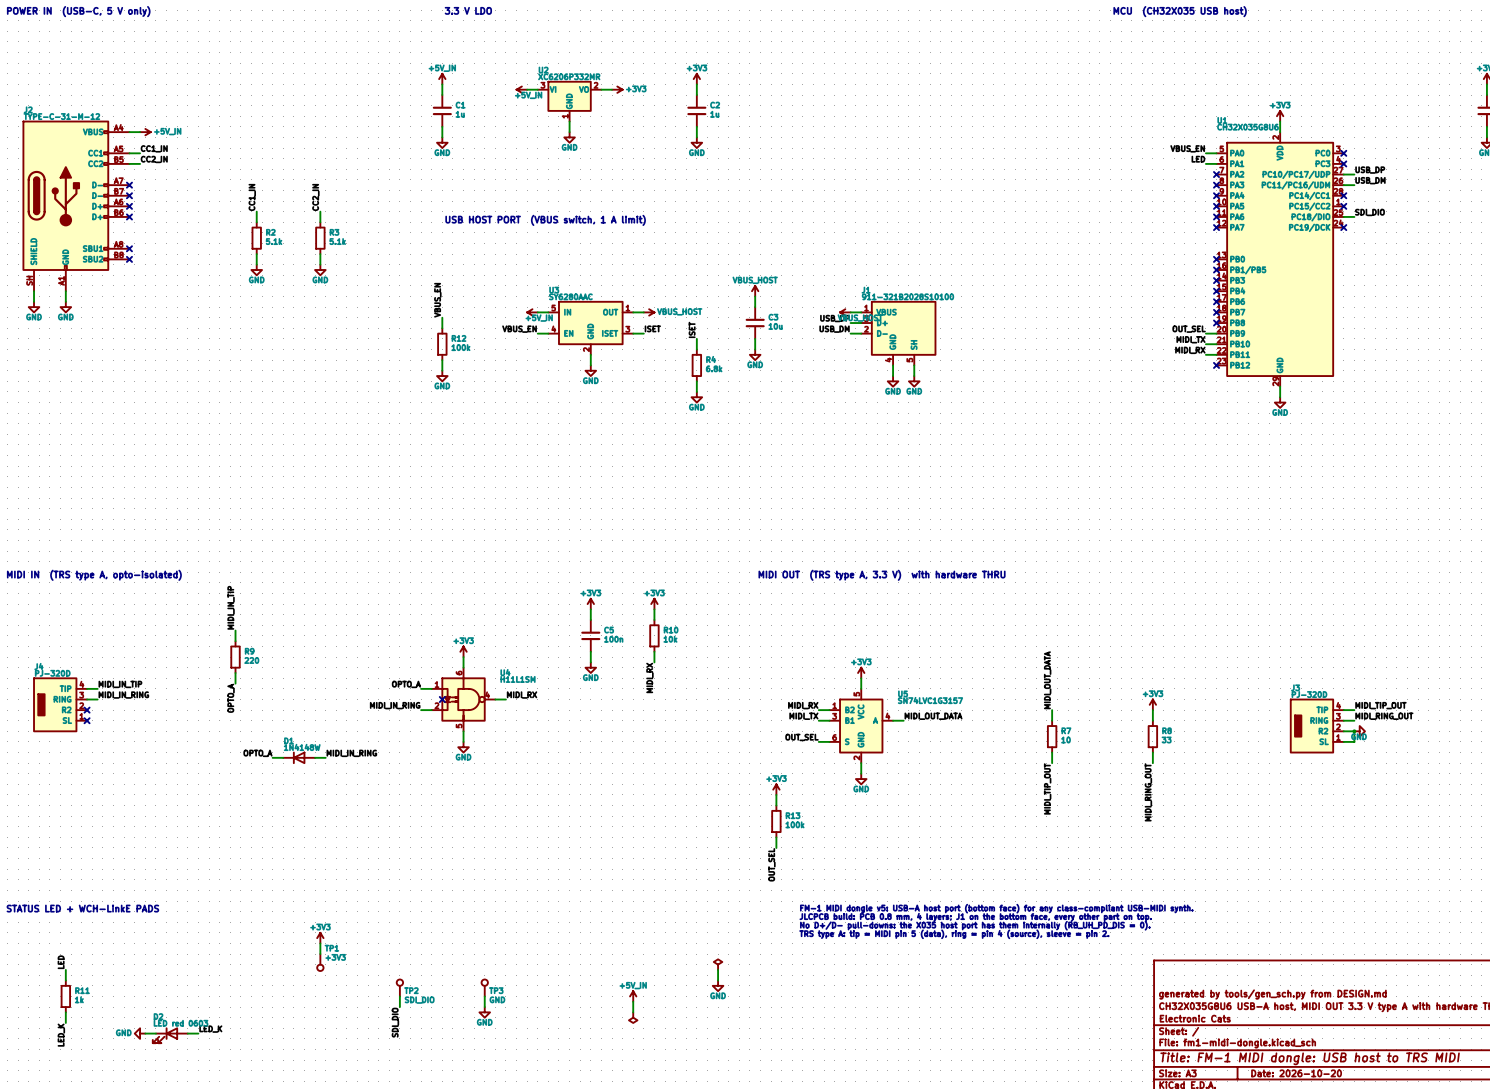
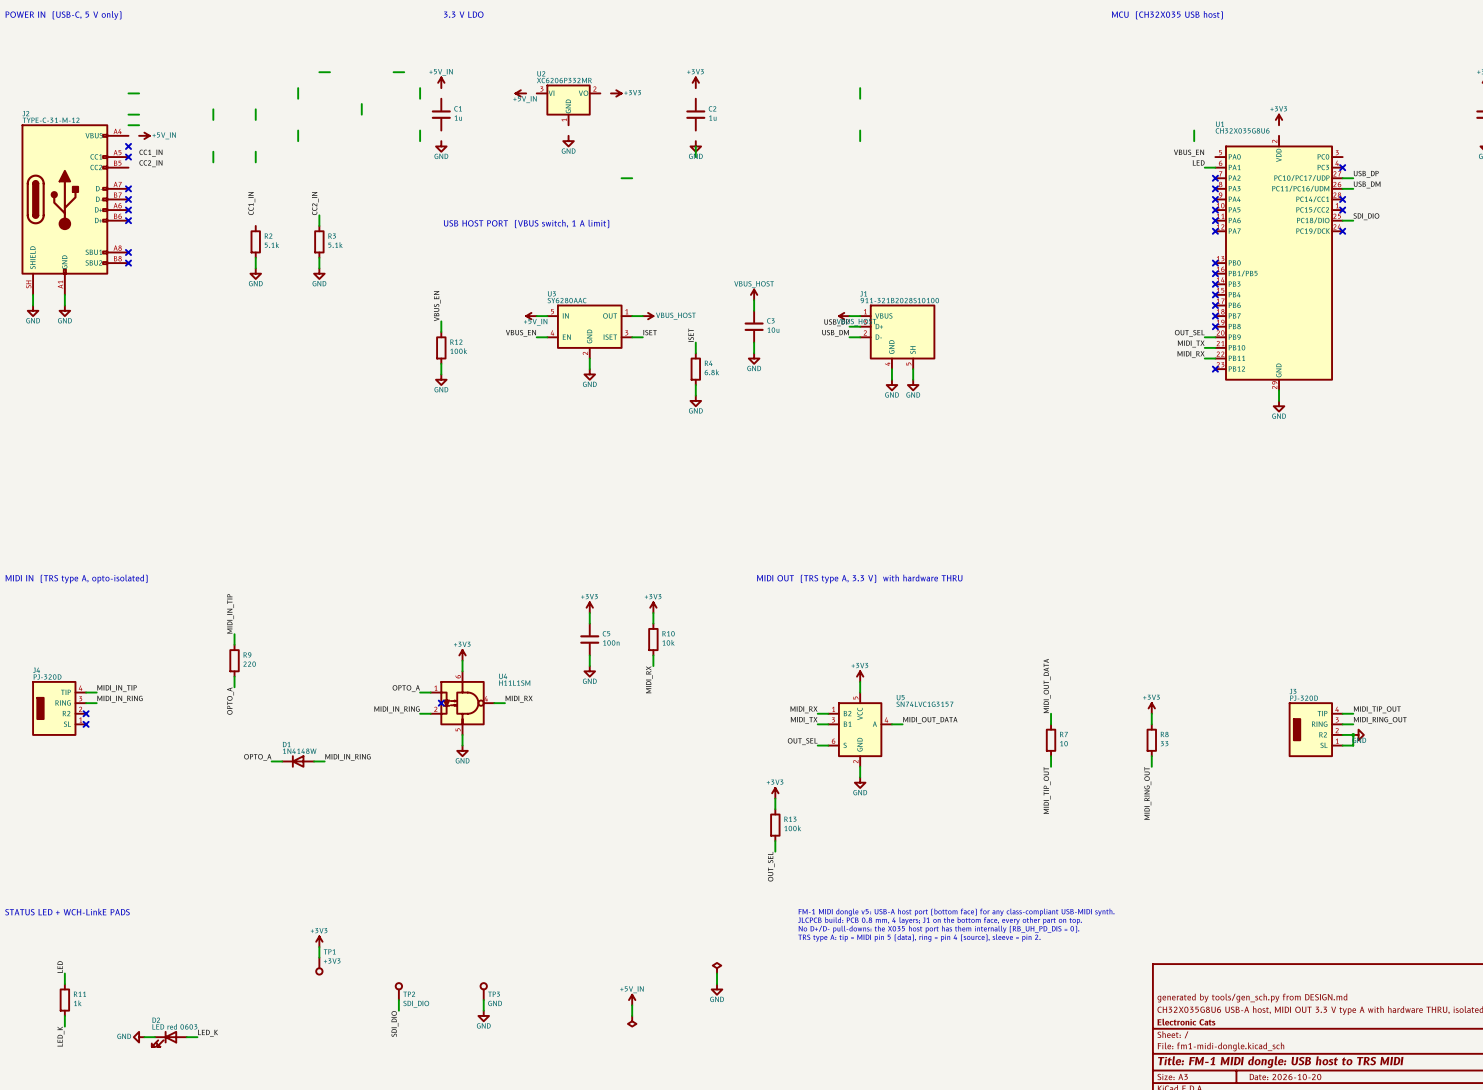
wire: none -> (319, 72) (329, 72)
wire: none -> (393, 72) (404, 72)
wire: none -> (298, 88) (298, 98)
wire: (442, 84) (442, 95) -> (420, 88) (420, 98)
wire: (696, 84) (696, 95) -> none
wire: none -> (860, 88) (860, 98)
wire: (527, 89) (537, 89) -> none
wire: (601, 89) (612, 89) -> (621, 178) (632, 178)
wire: none -> (361, 104) (361, 114)
wire: none -> (213, 109) (213, 119)
wire: none -> (255, 109) (255, 119)
wire: (569, 121) (569, 132) -> none
wire: (1280, 121) (1280, 132) -> (1194, 130) (1194, 141)
wire: none -> (298, 130) (298, 141)
wire: (442, 126) (442, 137) -> (420, 130) (420, 141)
wire: (696, 126) (696, 137) -> (695, 146) (695, 157)
wire: none -> (860, 130) (860, 141)
wire: (129, 132) (140, 132) -> (128, 93) (139, 93)
no-connect mark: none -> (128, 146)
wire: none -> (213, 151) (213, 162)
wire: (129, 153) (140, 153) -> (128, 114) (139, 114)
no-connect mark: none -> (128, 157)
wire: (1205, 153) (1216, 153) -> none
no-connect mark: (1343, 153) -> none
wire: (129, 163) (140, 163) -> (128, 125) (139, 125)
wire: (256, 211) (256, 222) -> (255, 151) (255, 162)

